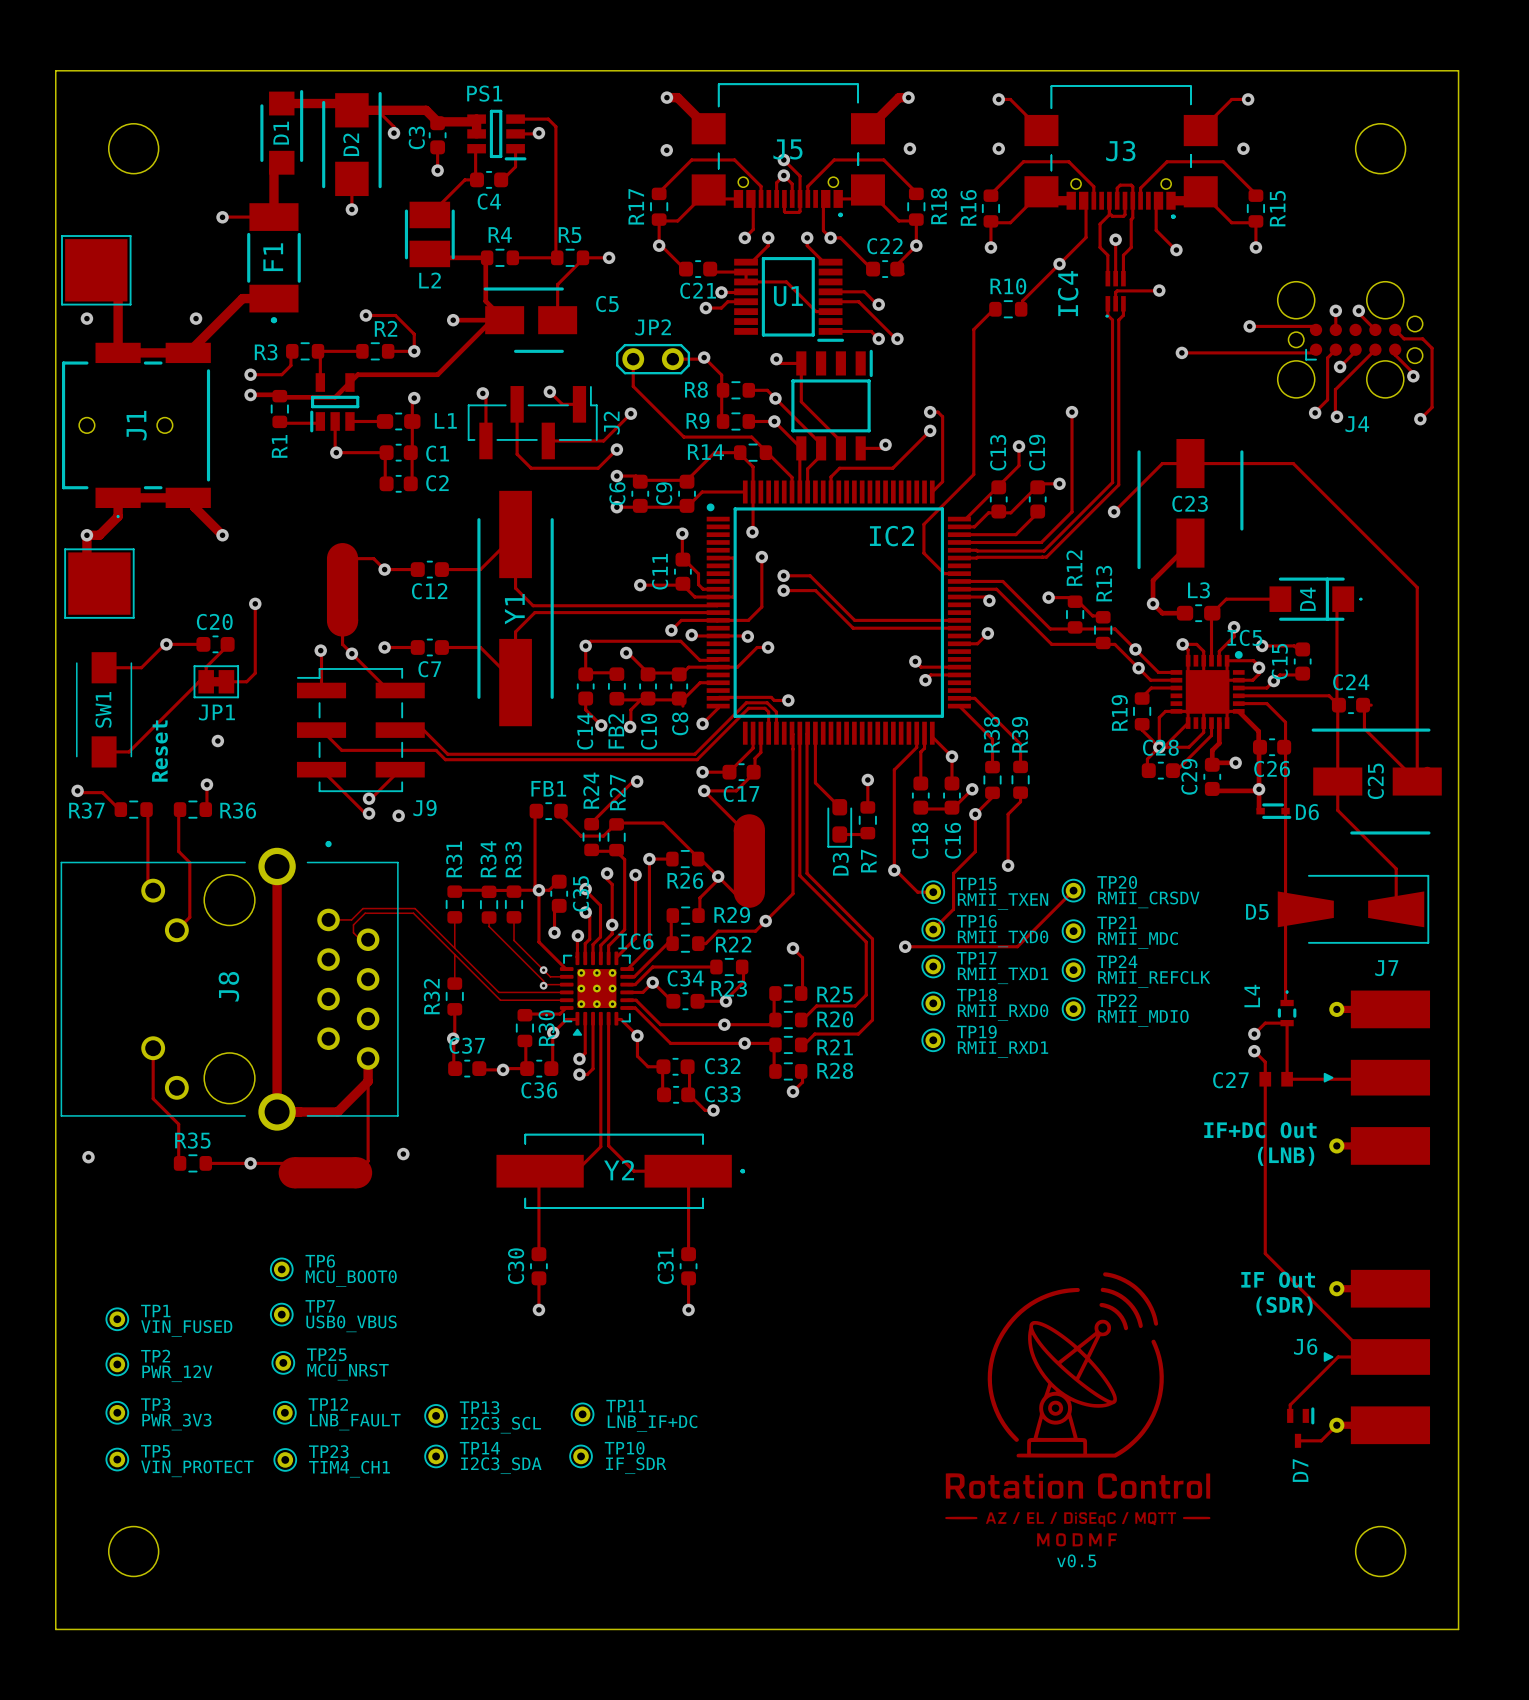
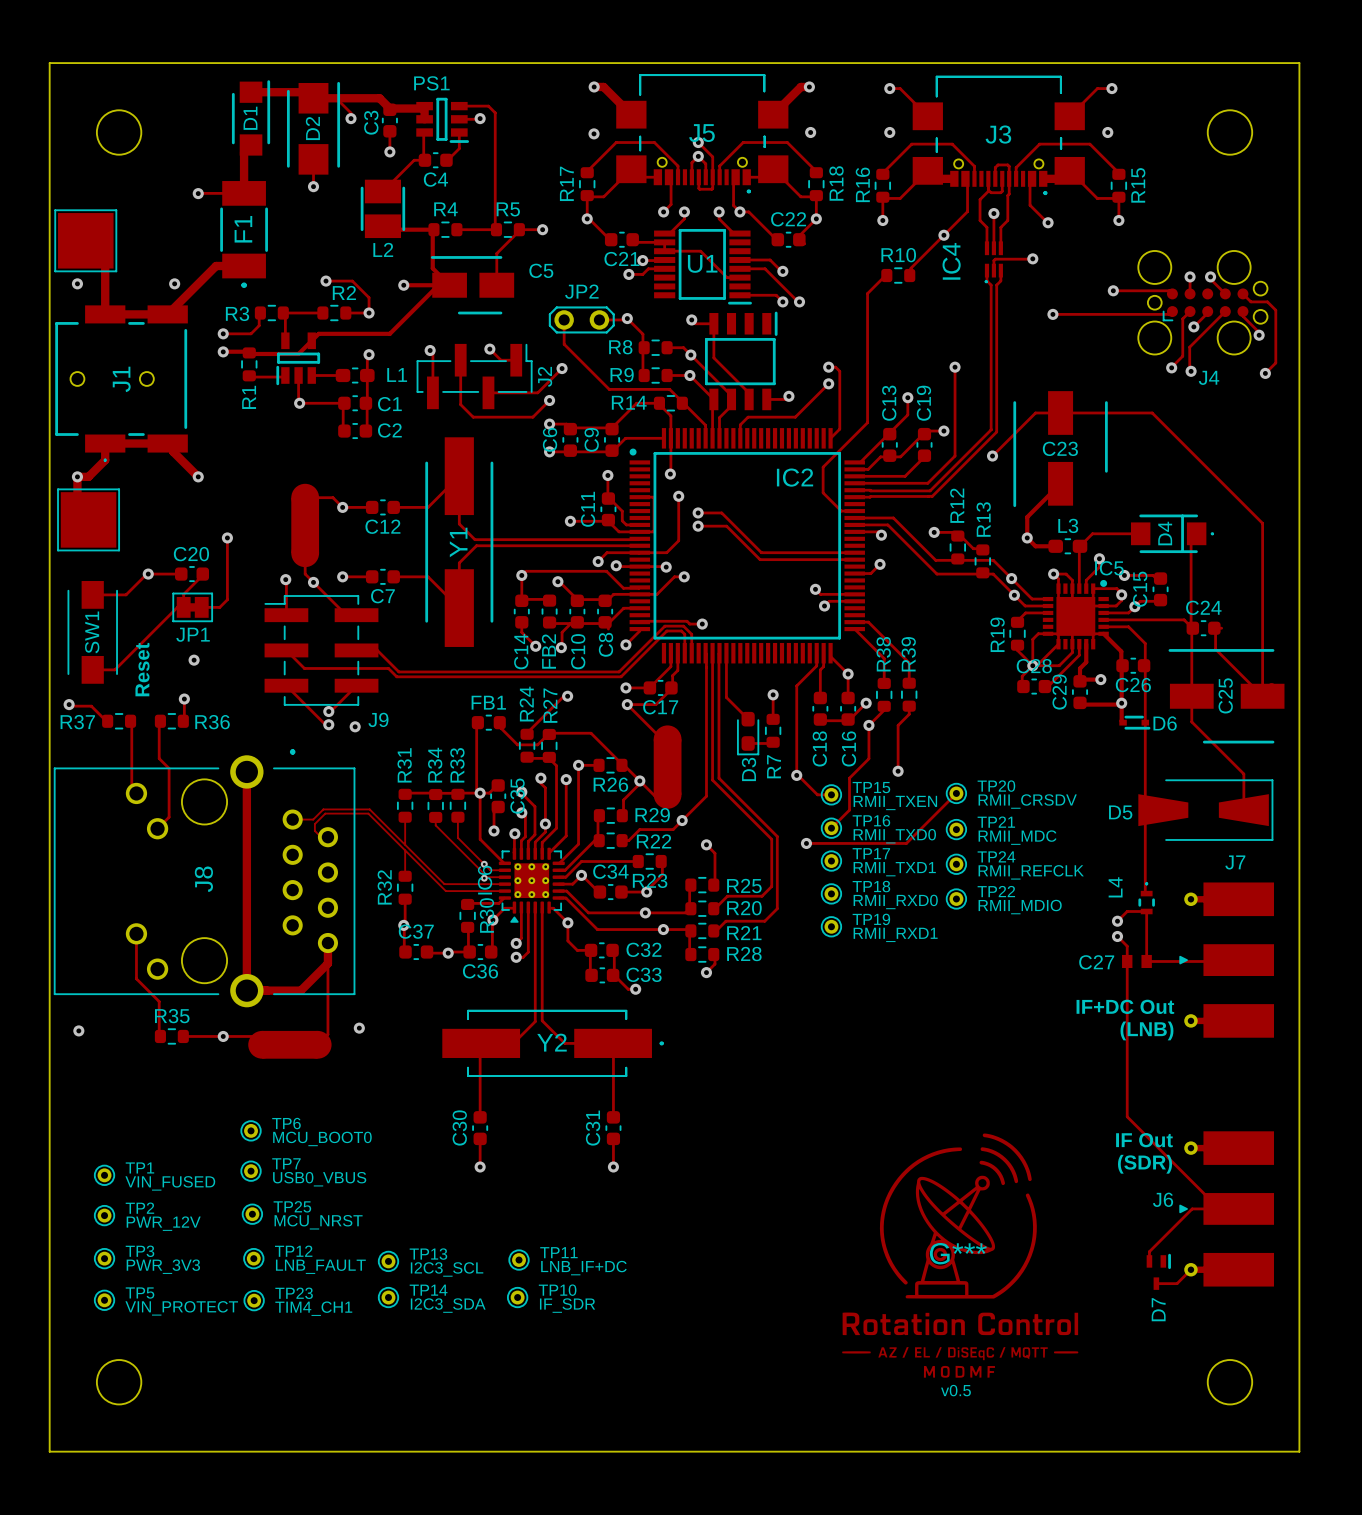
IC6 name rotation: 0° (635, 941) -> 90° counterclockwise (485, 880)
IC6 name position: IC6 (635, 941) -> IC6 (485, 880)
drawing: [945, 1272, 1211, 1547] -> none
G***: none -> (960, 1255)

